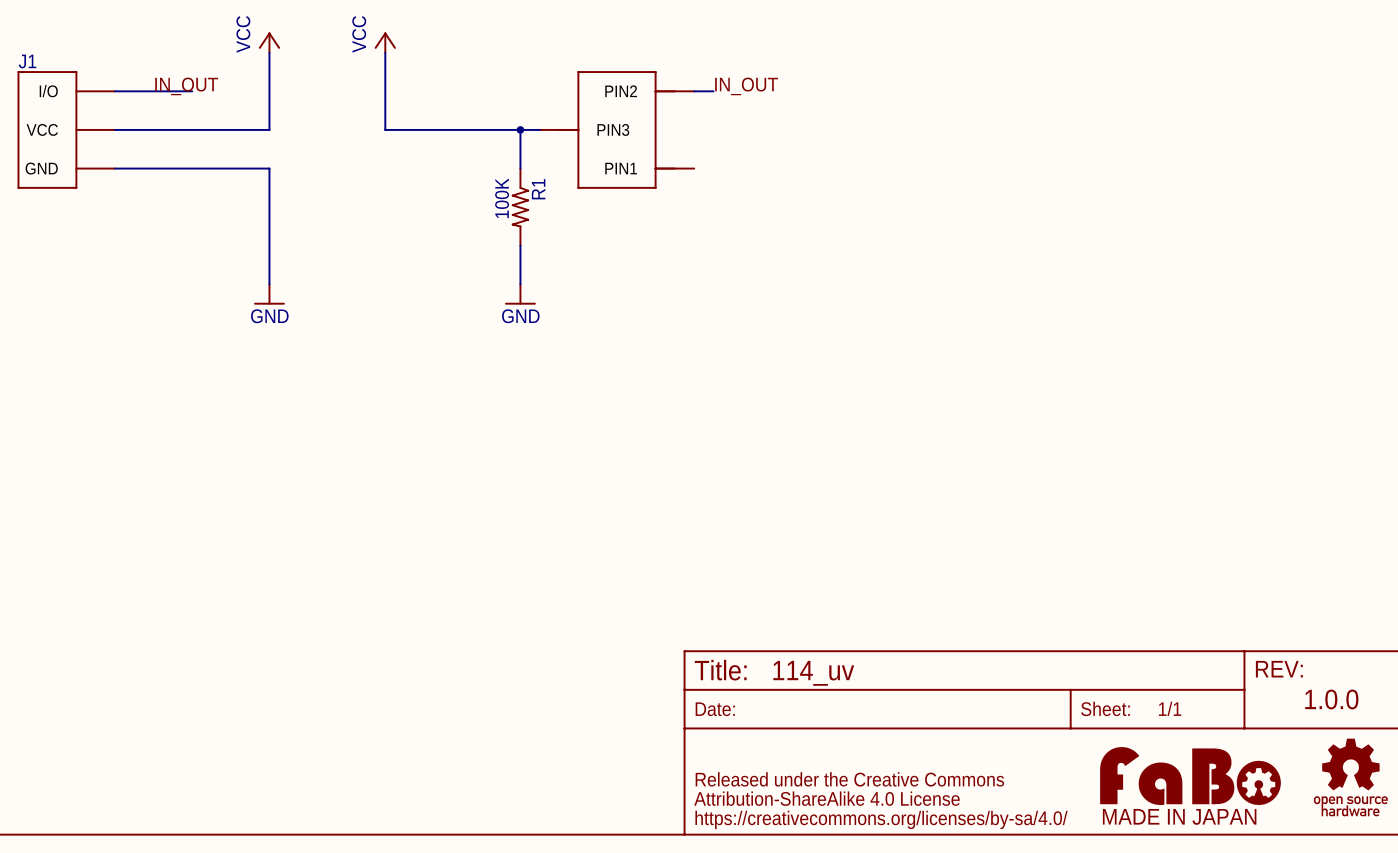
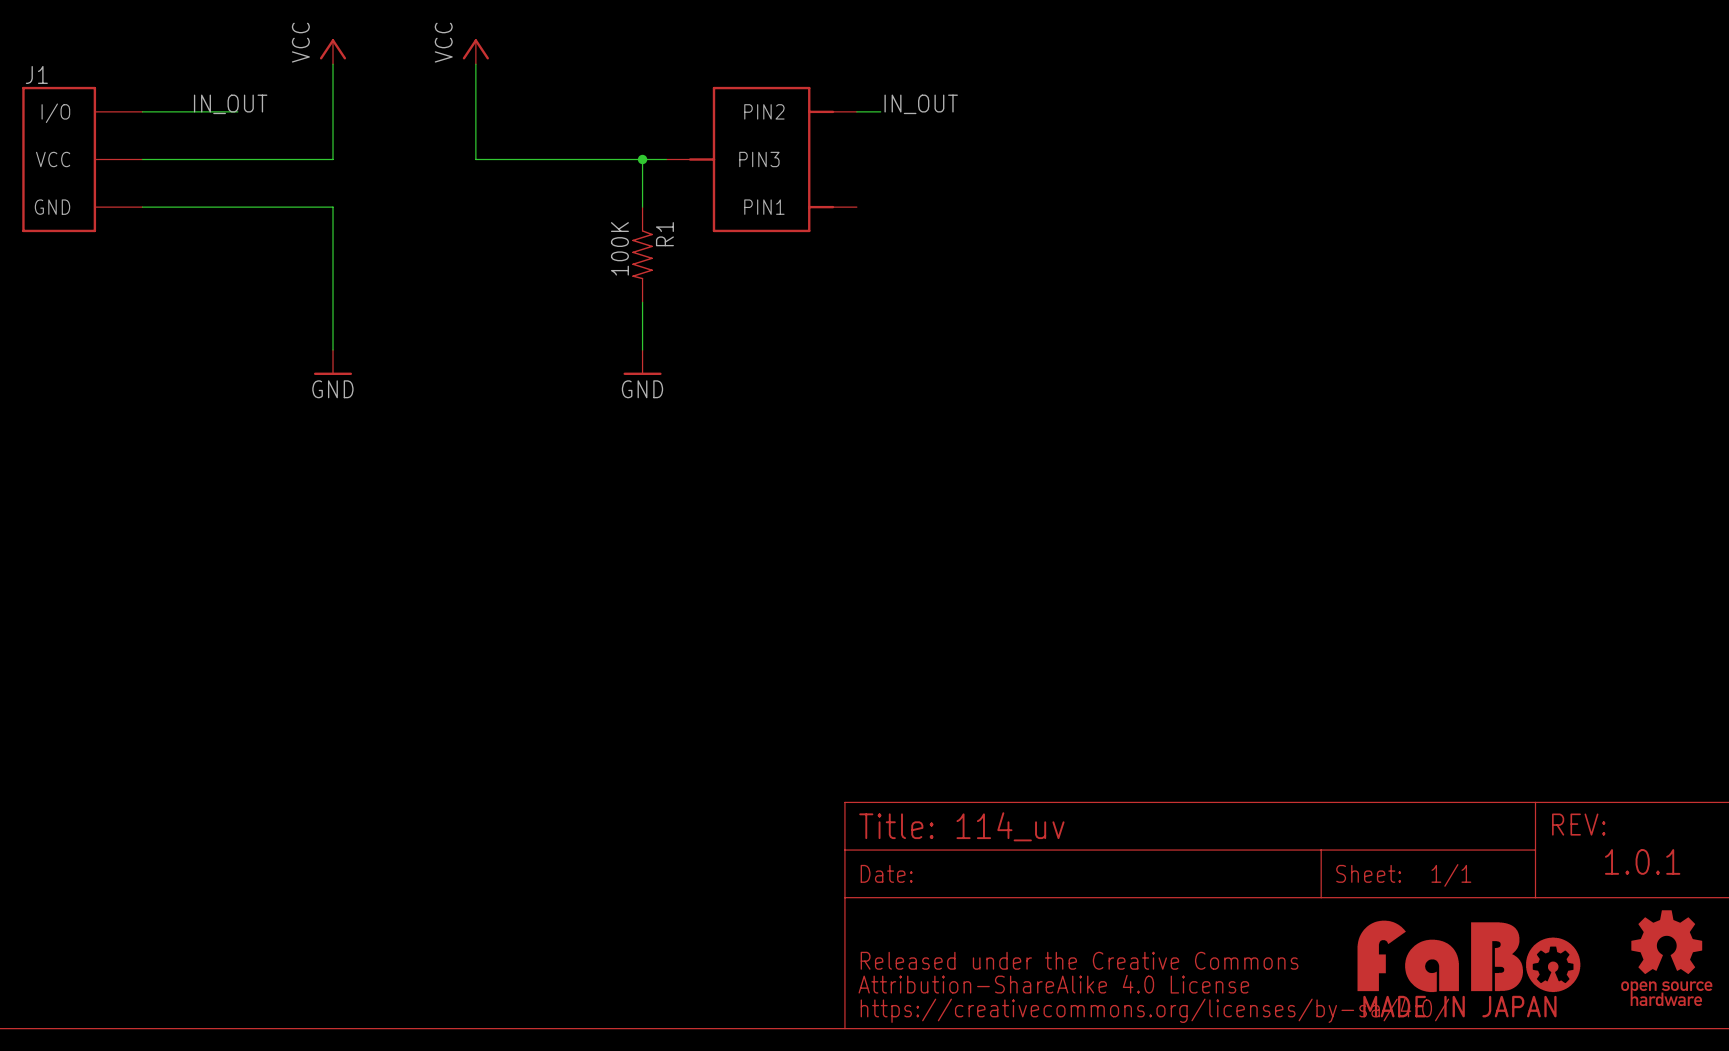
text: 1.0.0 (1331, 699) -> 1.0.1 (1642, 861)

